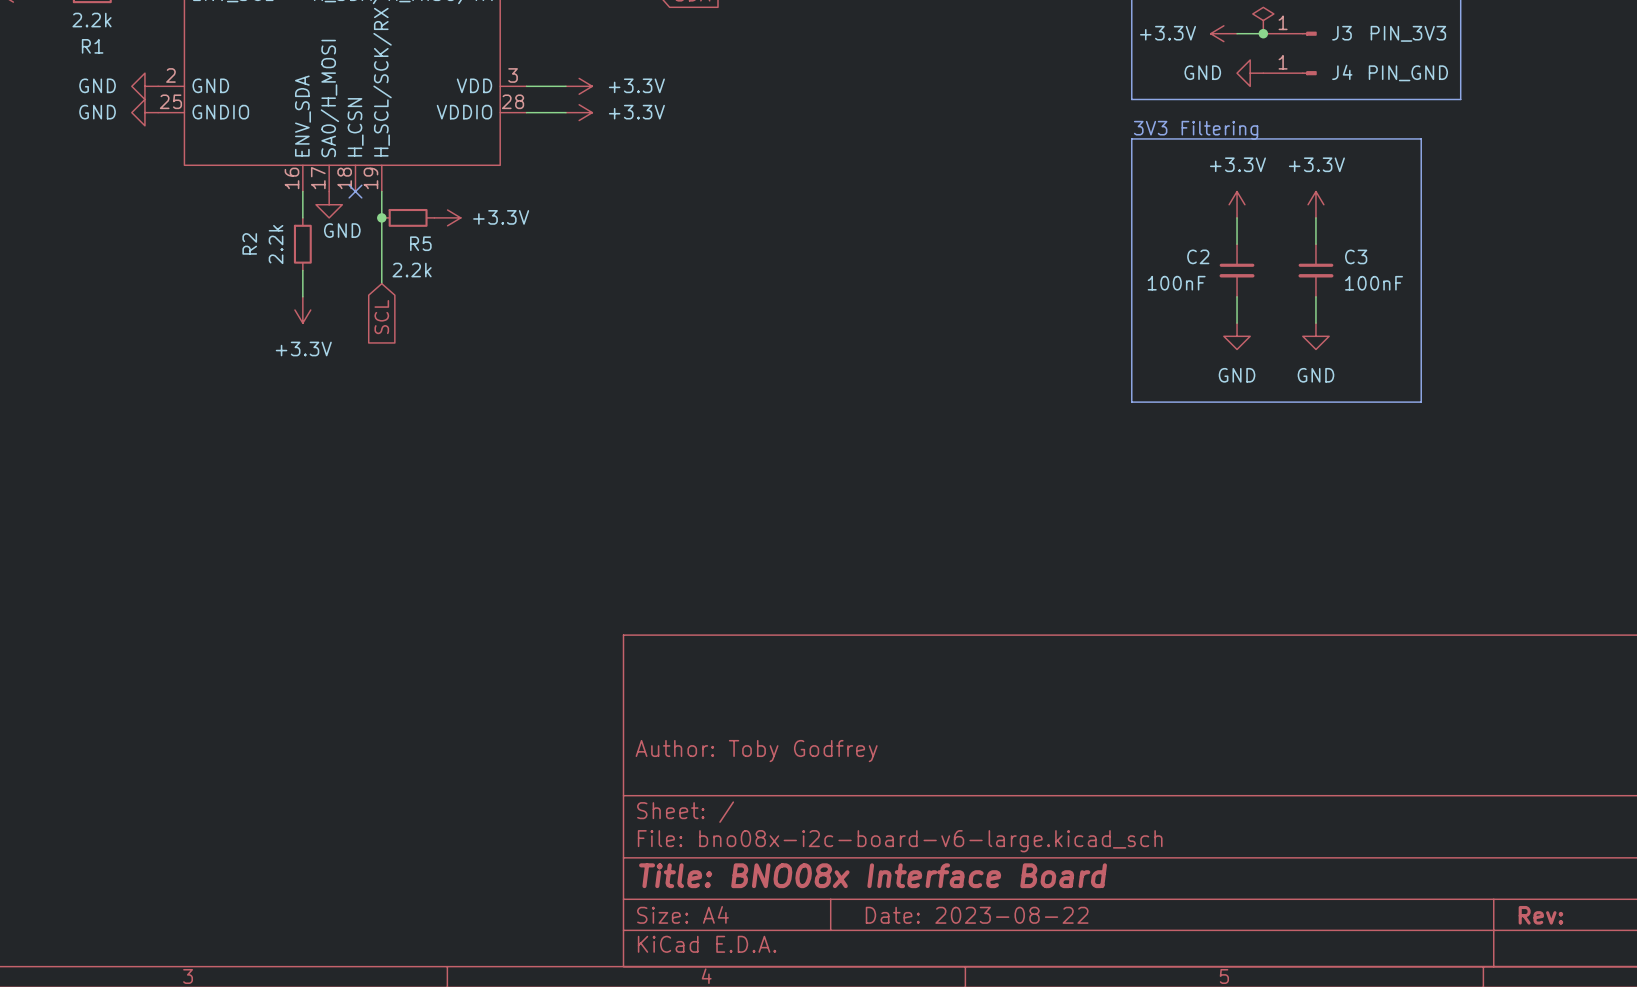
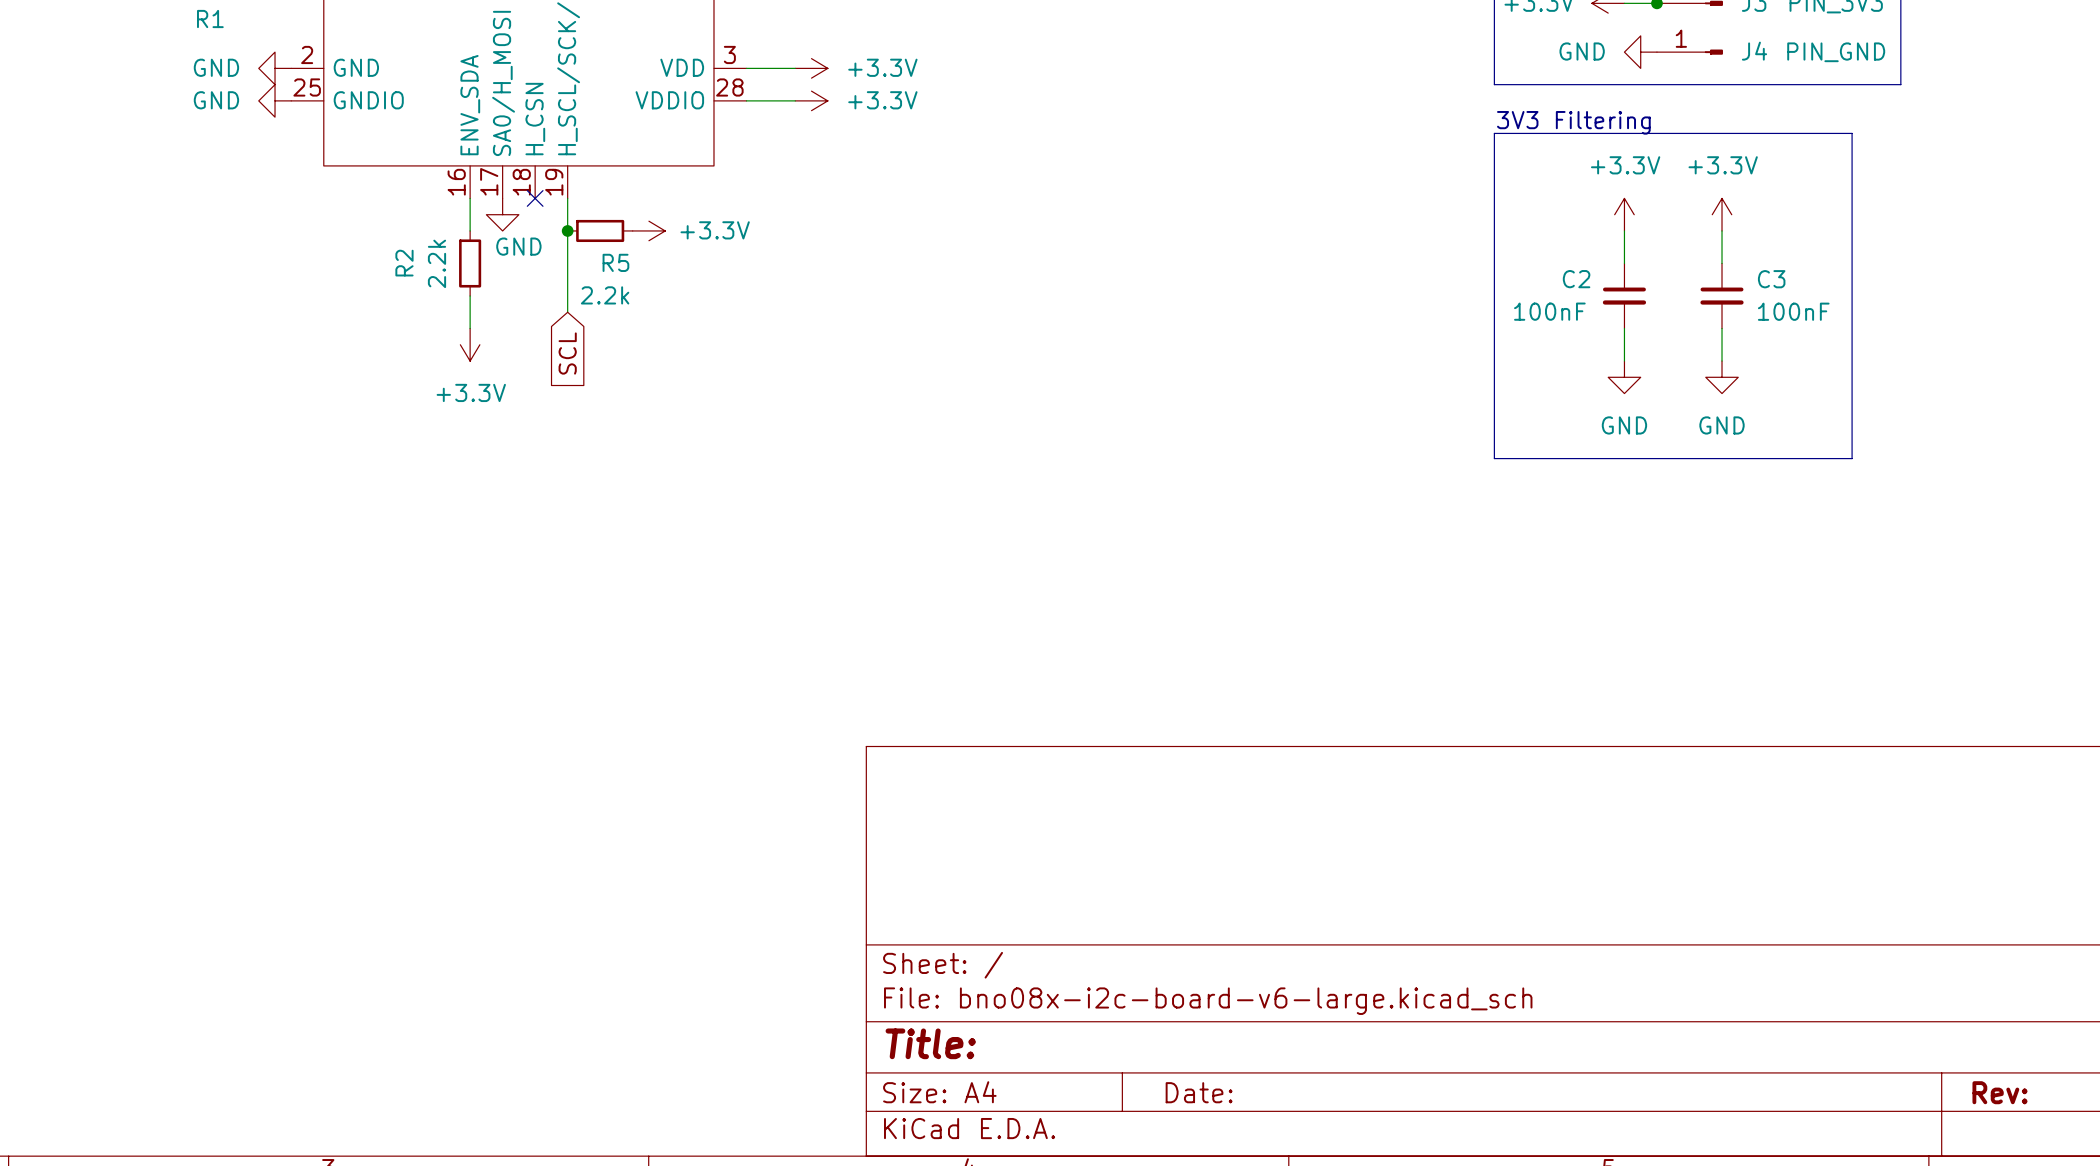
title block: Author: Toby Godfrey (756, 751) -> none
title block: Title: BNO08x Interface Board (873, 875) -> Title: (930, 1043)
title block: Date: 2023-08-22 (977, 915) -> Date: (1199, 1092)

